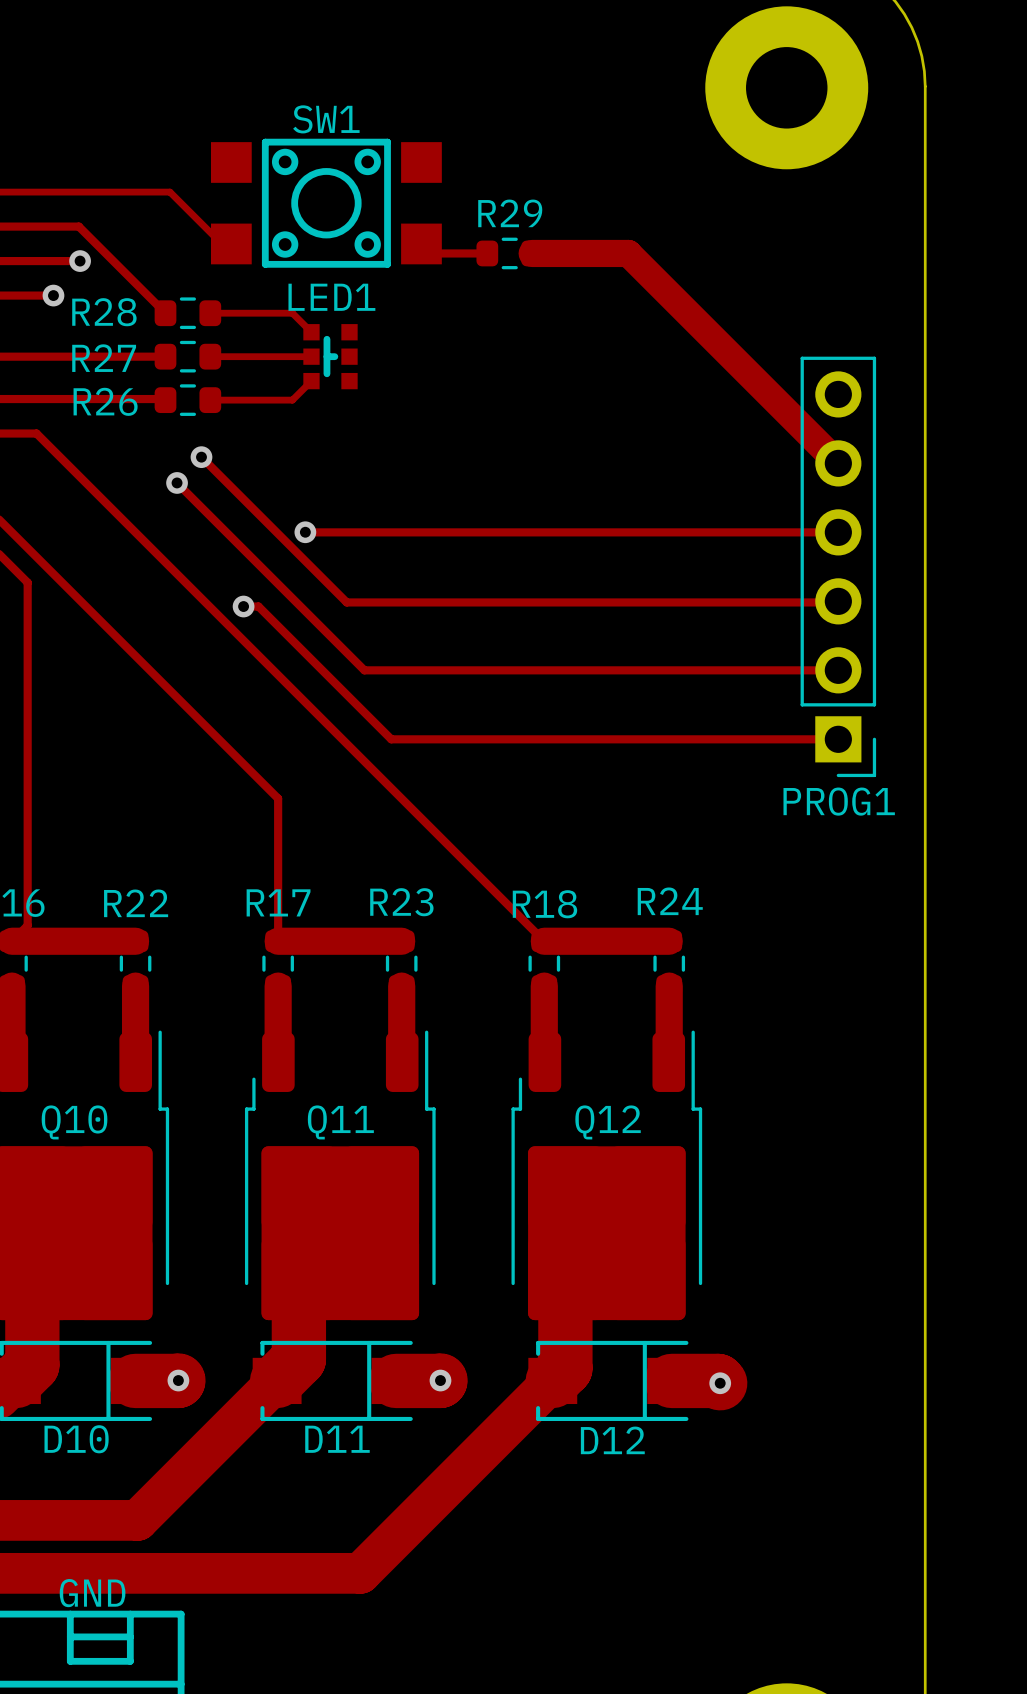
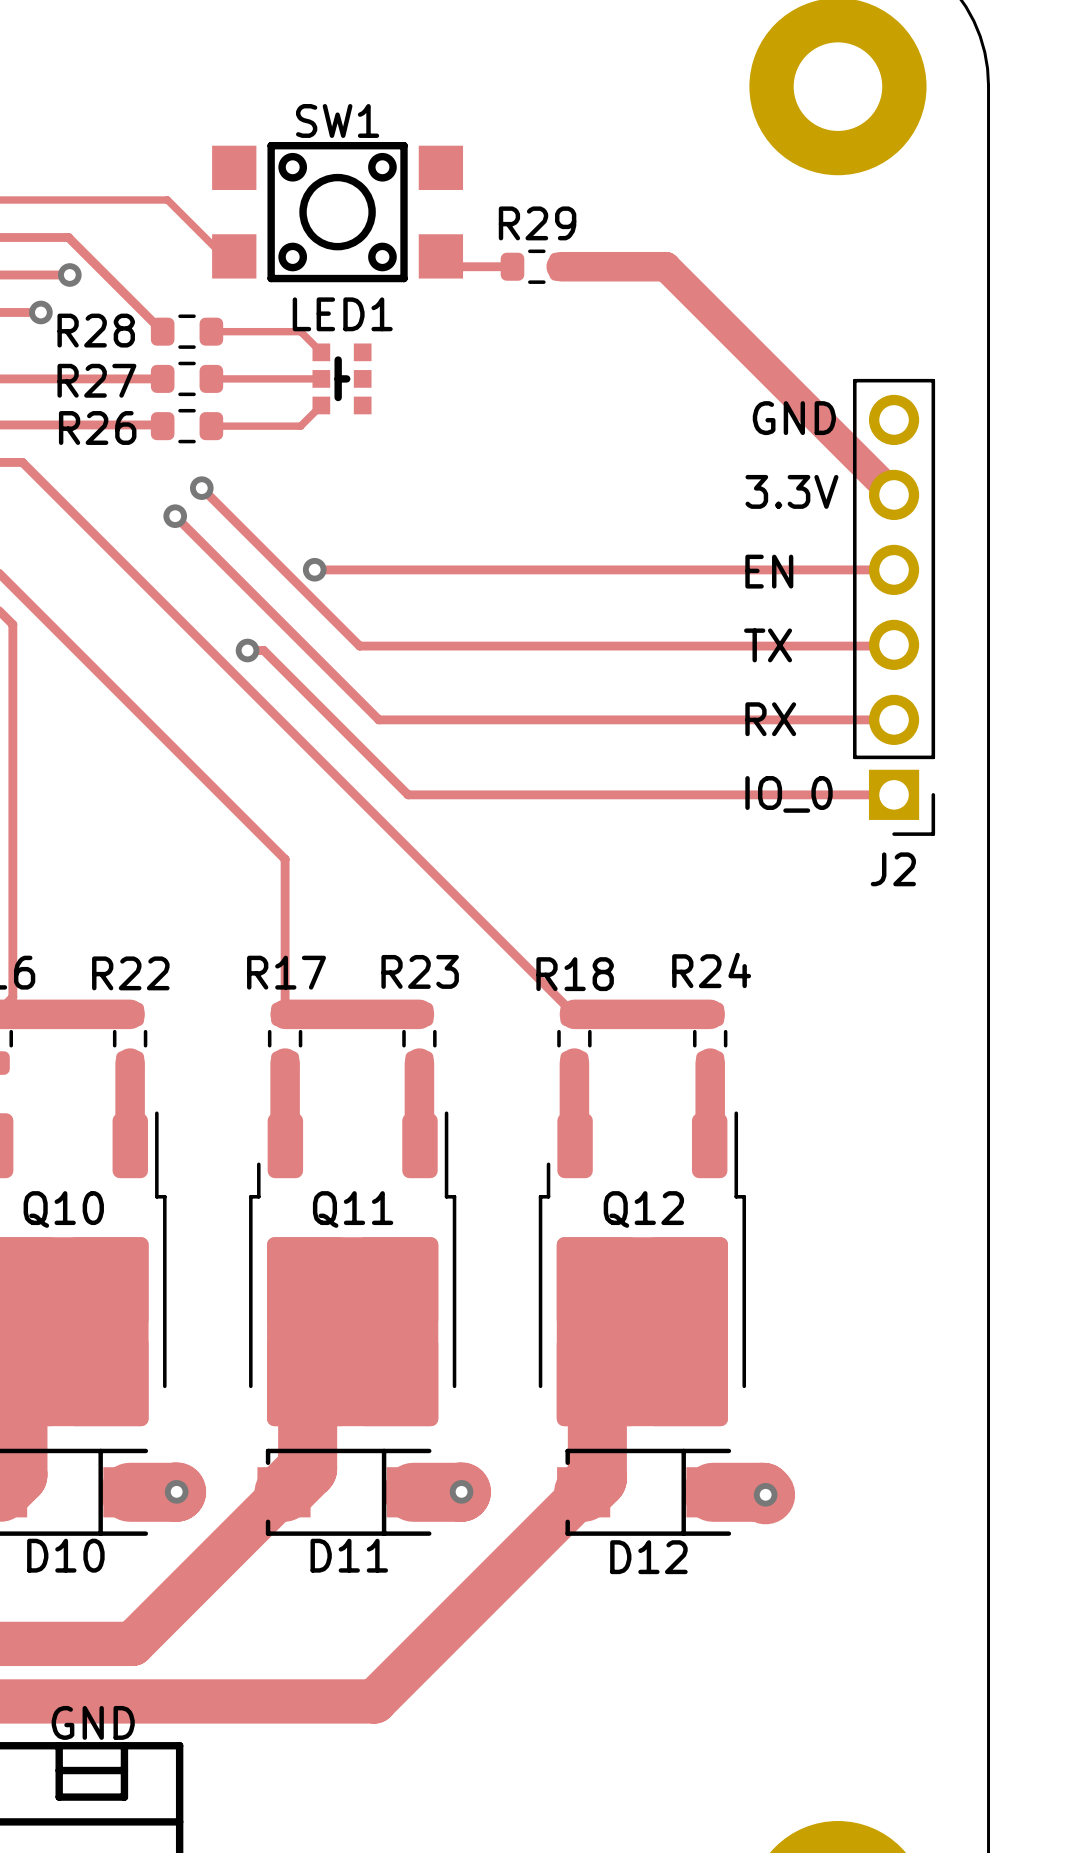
text: none -> GND (794, 418)
text: none -> 3.3V (791, 491)
text: none -> EN (769, 571)
text: none -> TX (768, 645)
text: none -> RX (770, 719)
text: none -> IO_0 (789, 794)
PROG1 name: PROG1 (839, 801) -> J2 (893, 869)

